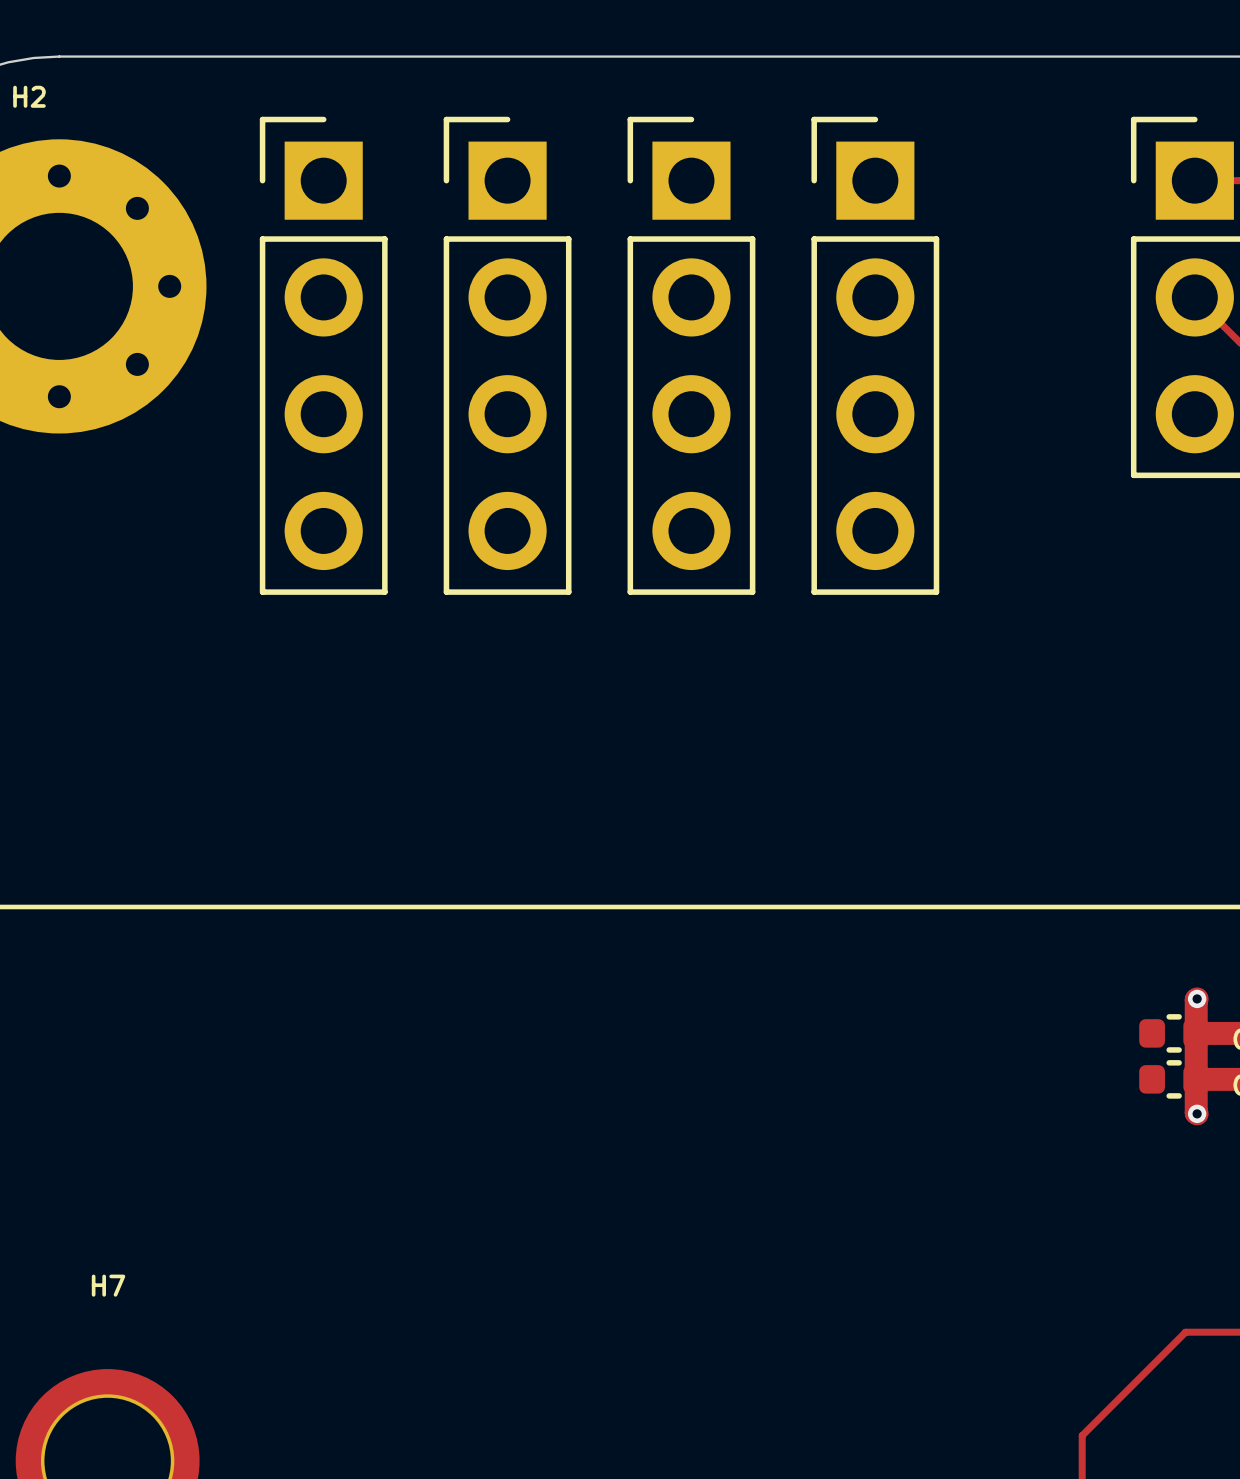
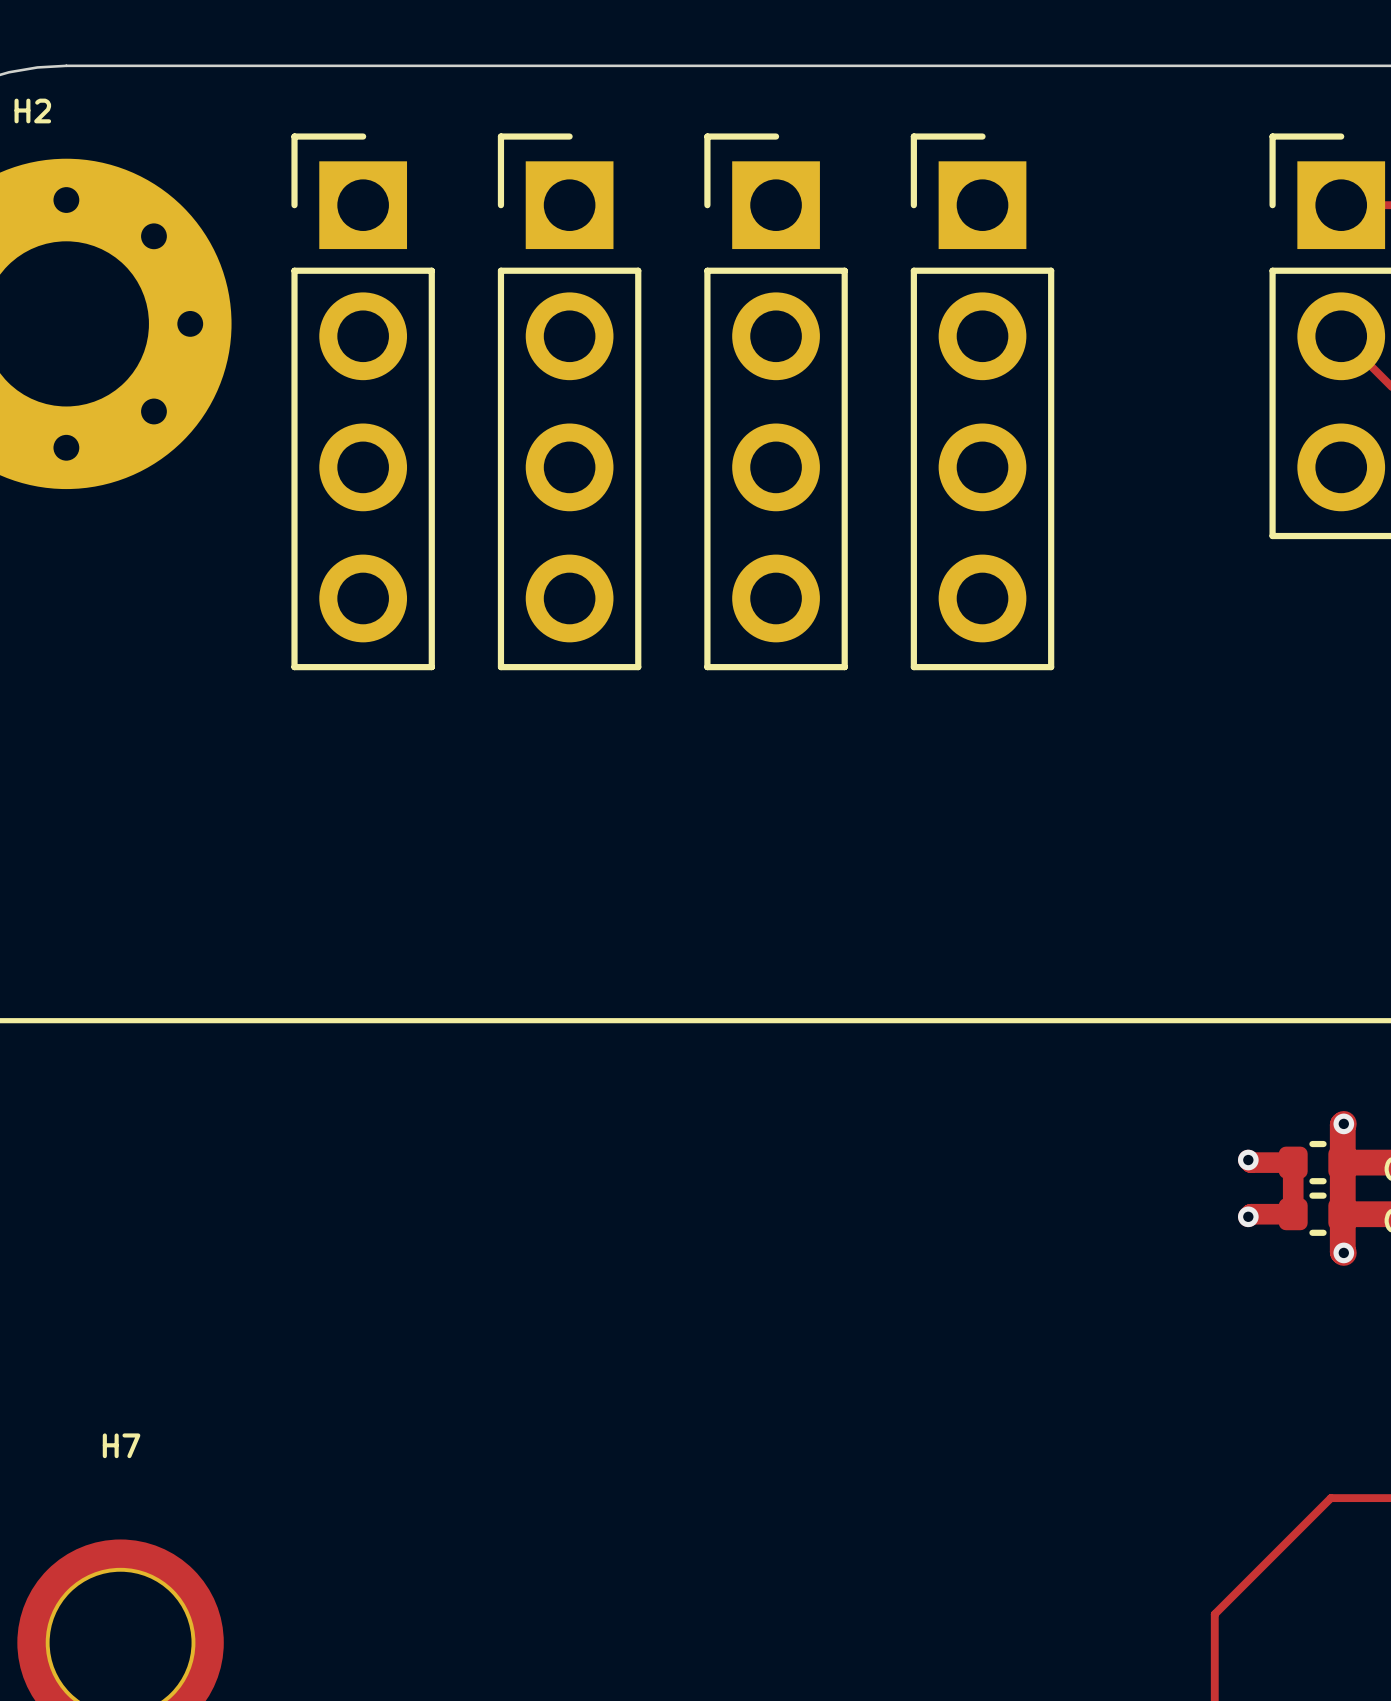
track: none -> (1248, 1160) (1250, 1162) (1293, 1162) (1293, 1214) (1250, 1214) (1248, 1216)
via: none -> (1248, 1160)
via: none -> (1248, 1216)

